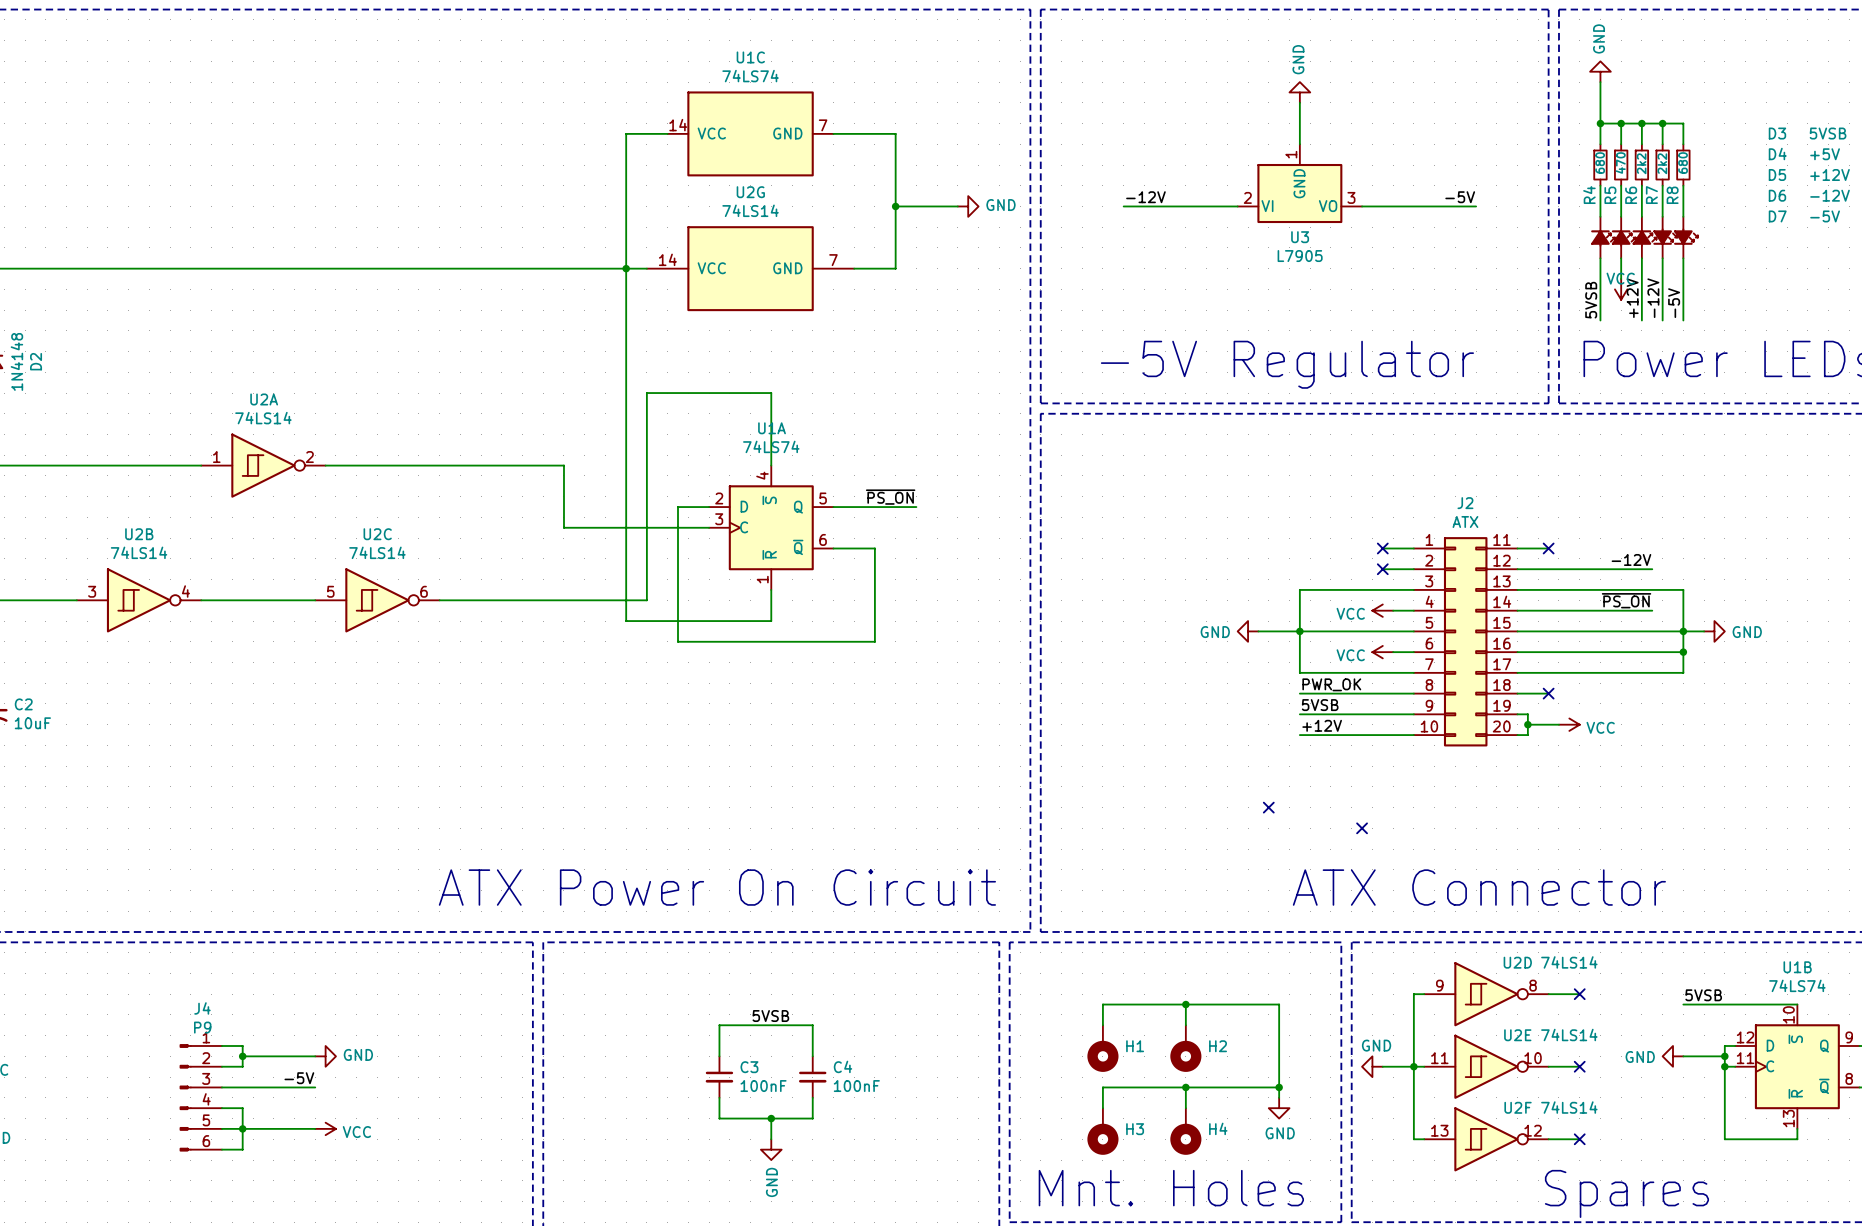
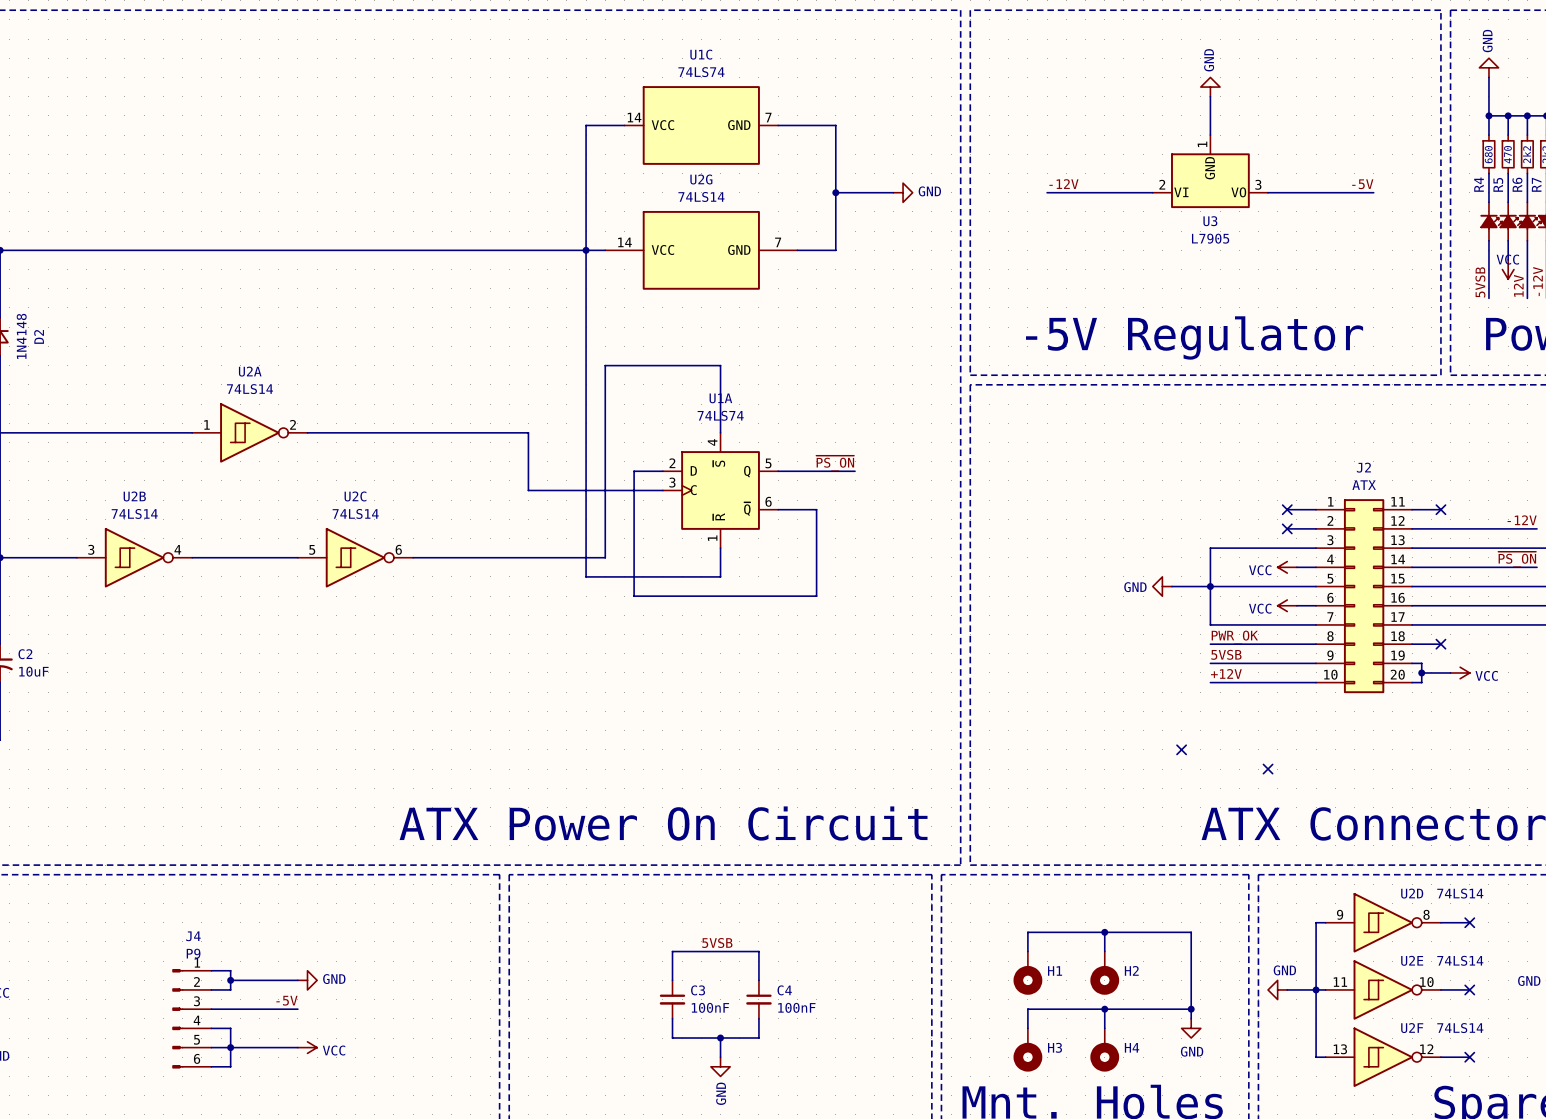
label: +12V (1632, 298) -> 12V (1518, 285)

